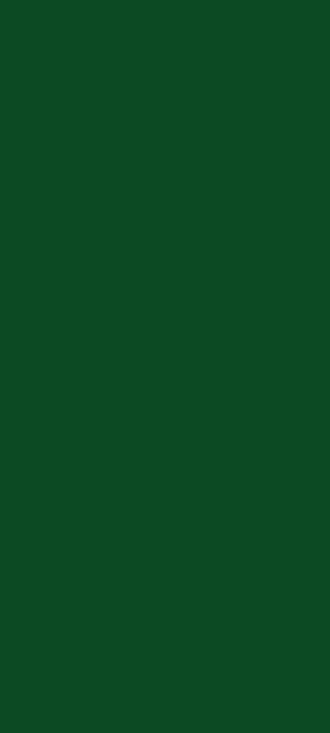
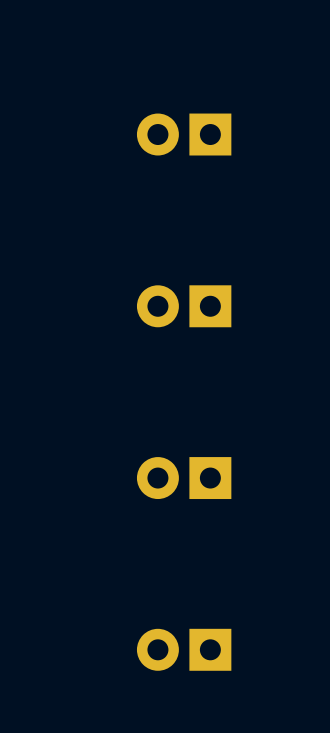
part: none -> (184, 134)
part: none -> (184, 306)
part: none -> (184, 478)
part: none -> (184, 649)

